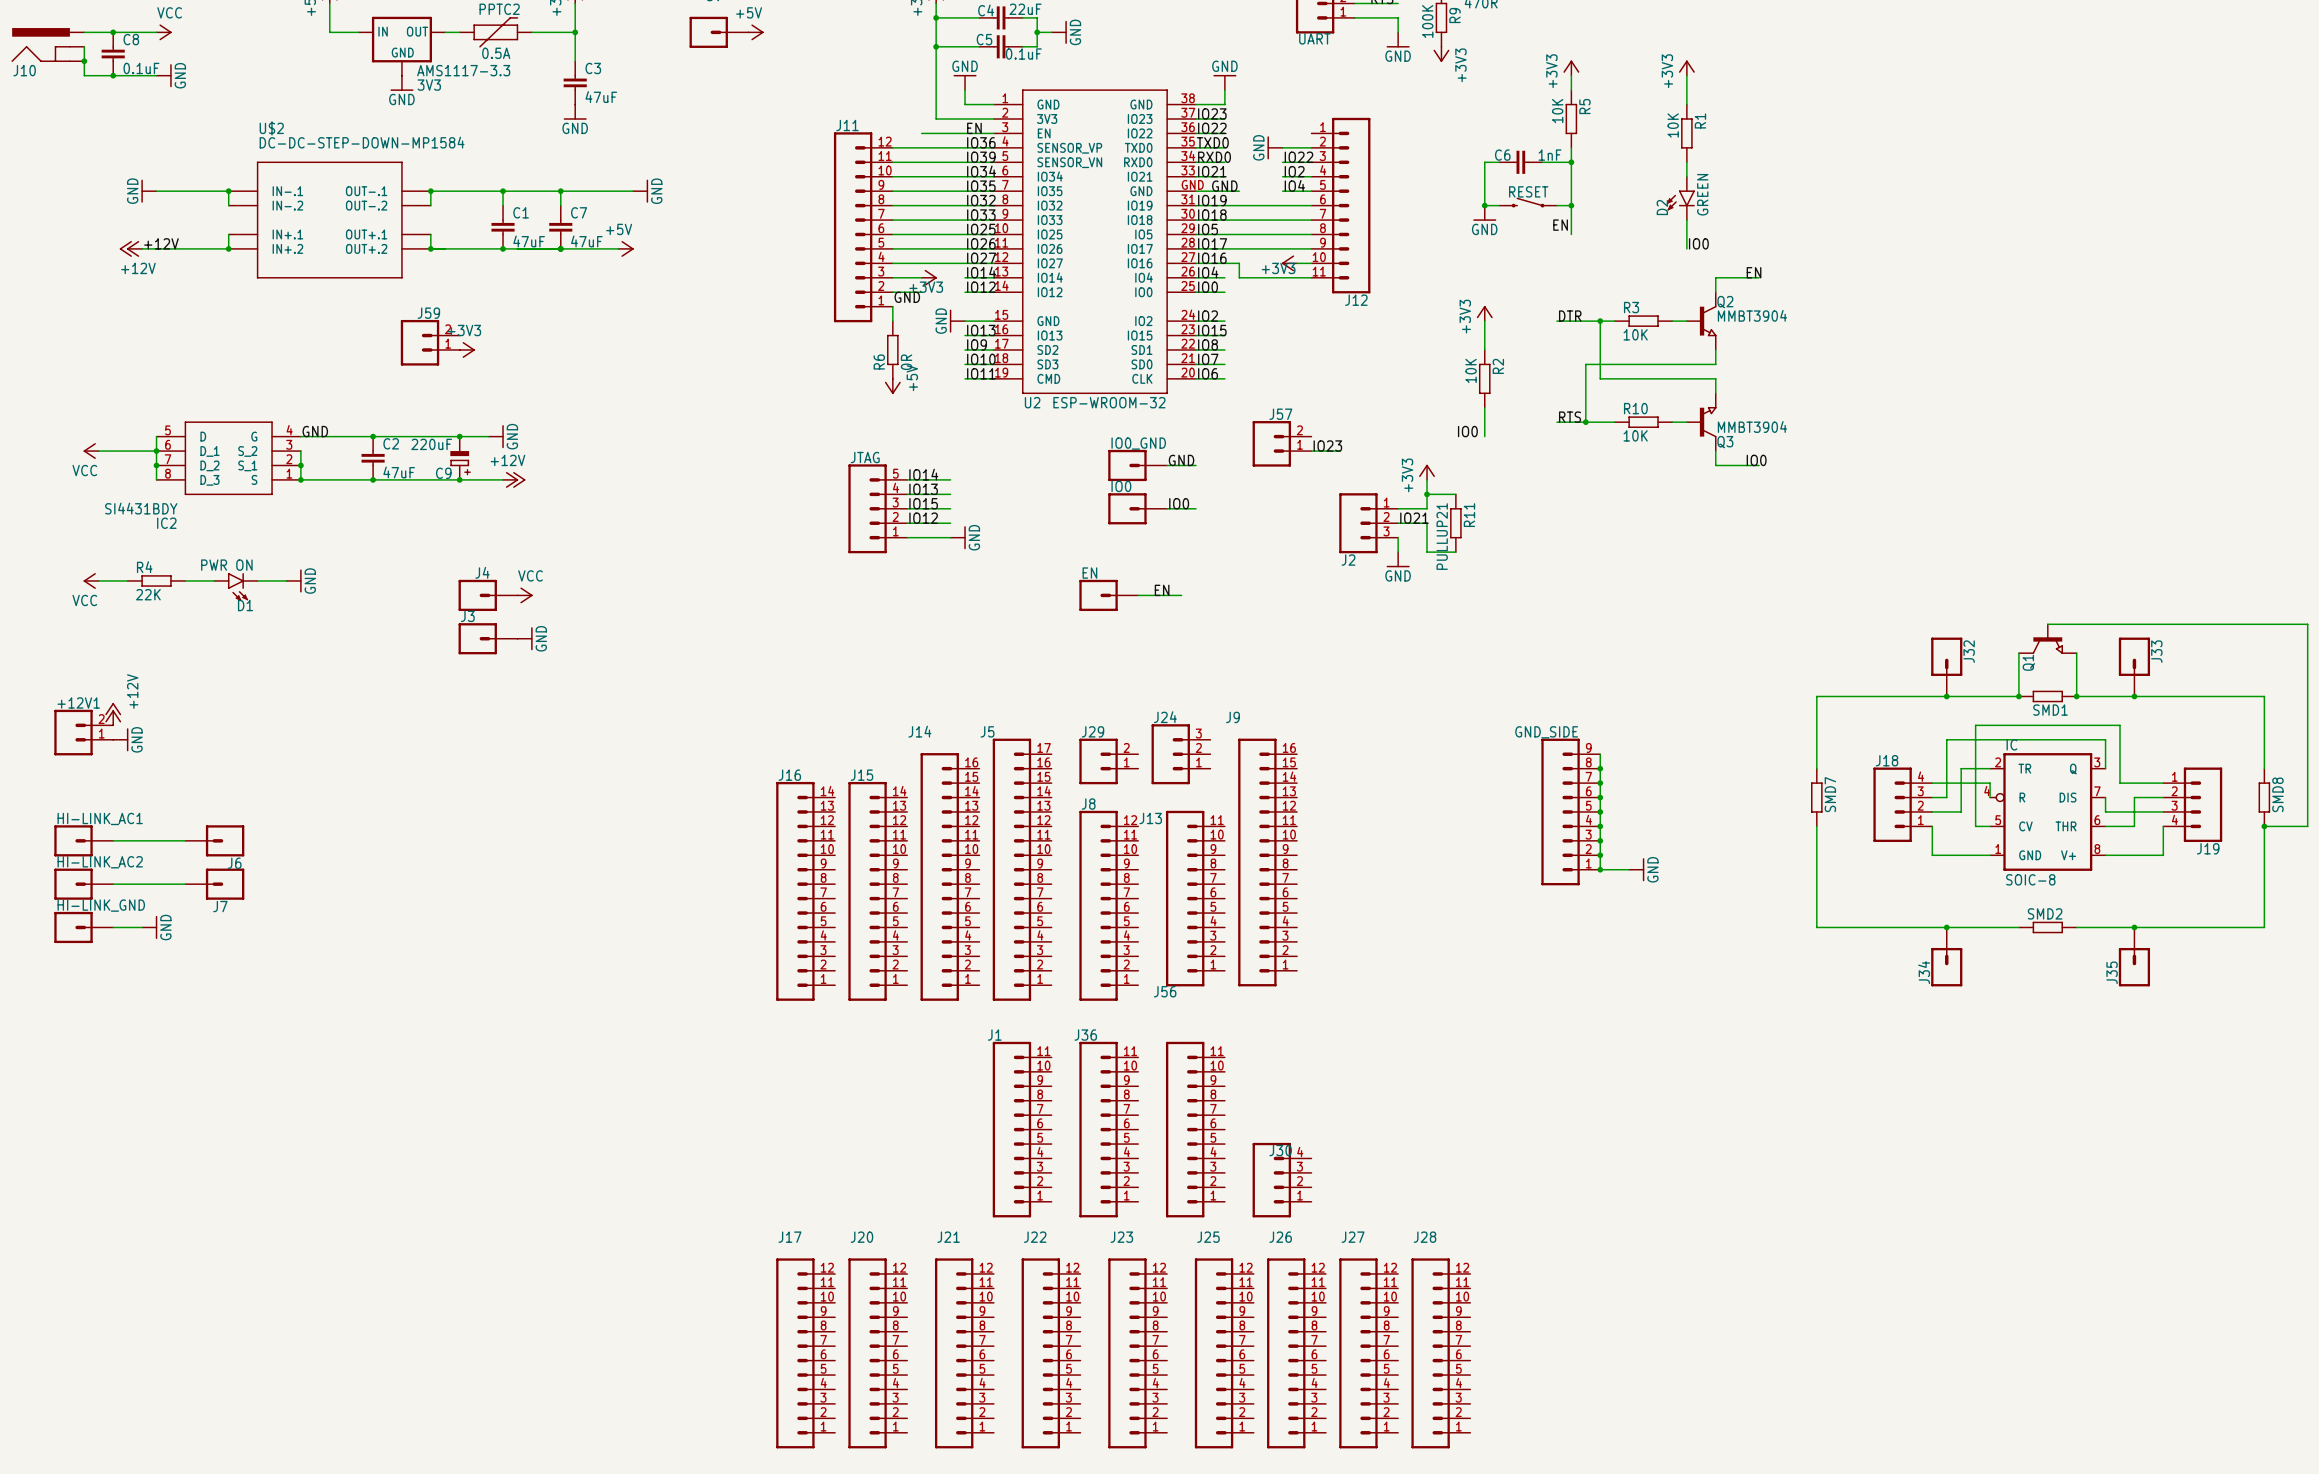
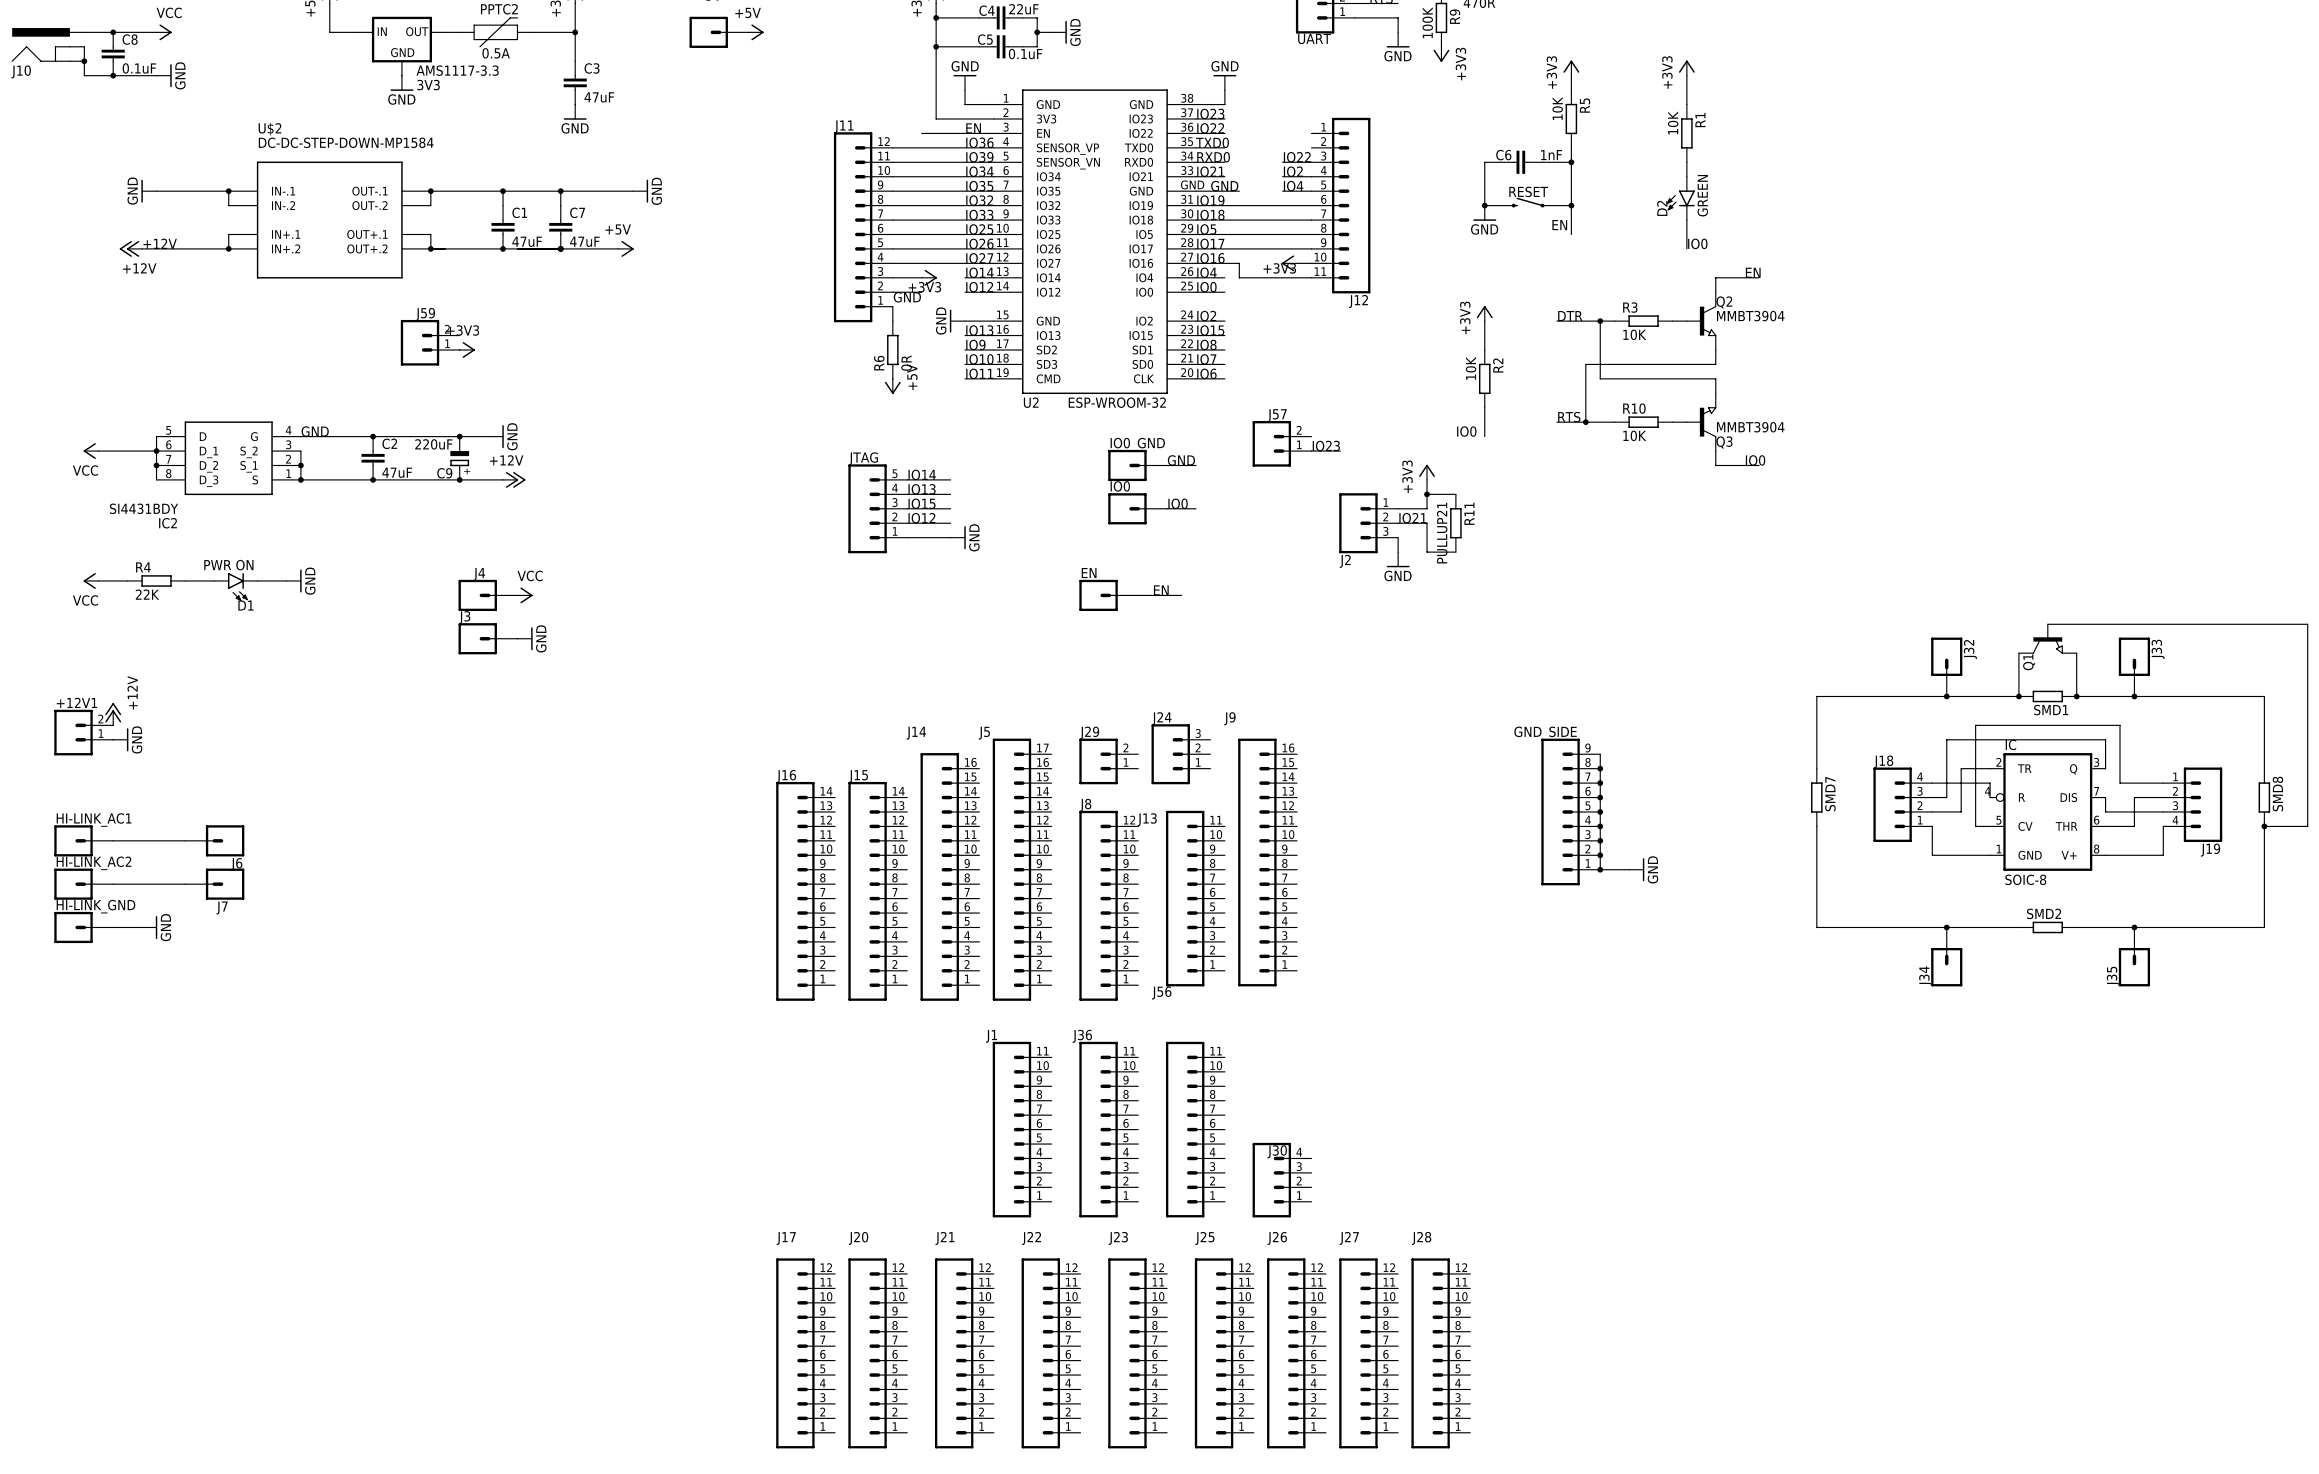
power symbol: GND (1275, 147) -> none
wire: (1282, 147) (1311, 147) -> none

